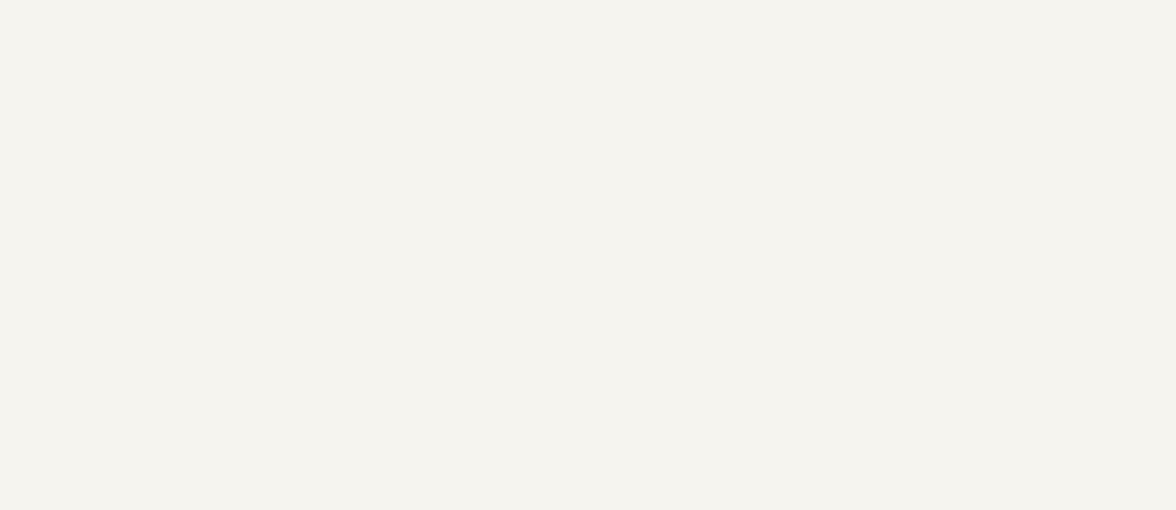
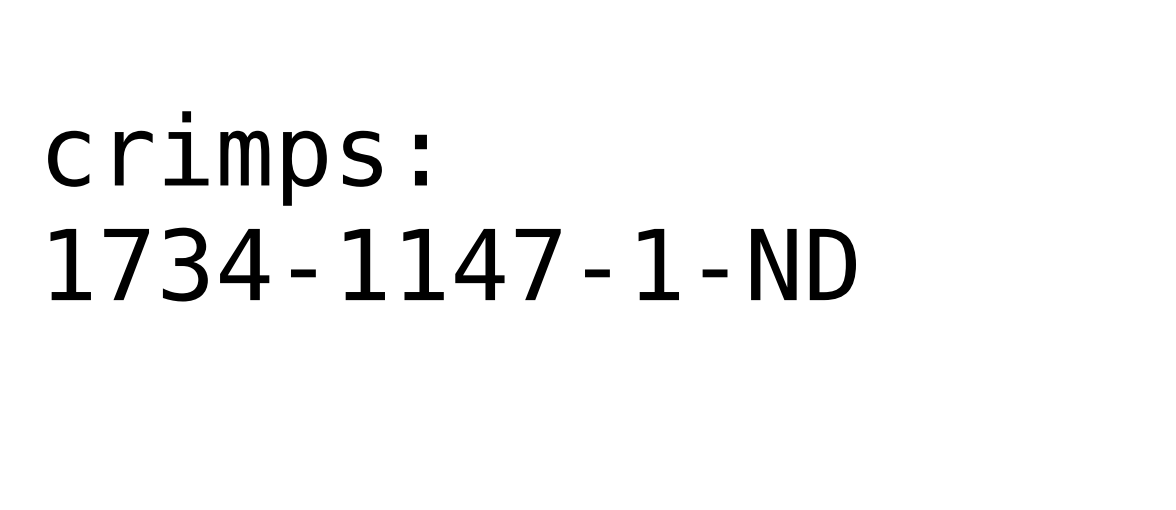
text: none -> crimps: (237, 158)
text: none -> 1734-1147-1-ND (453, 264)

